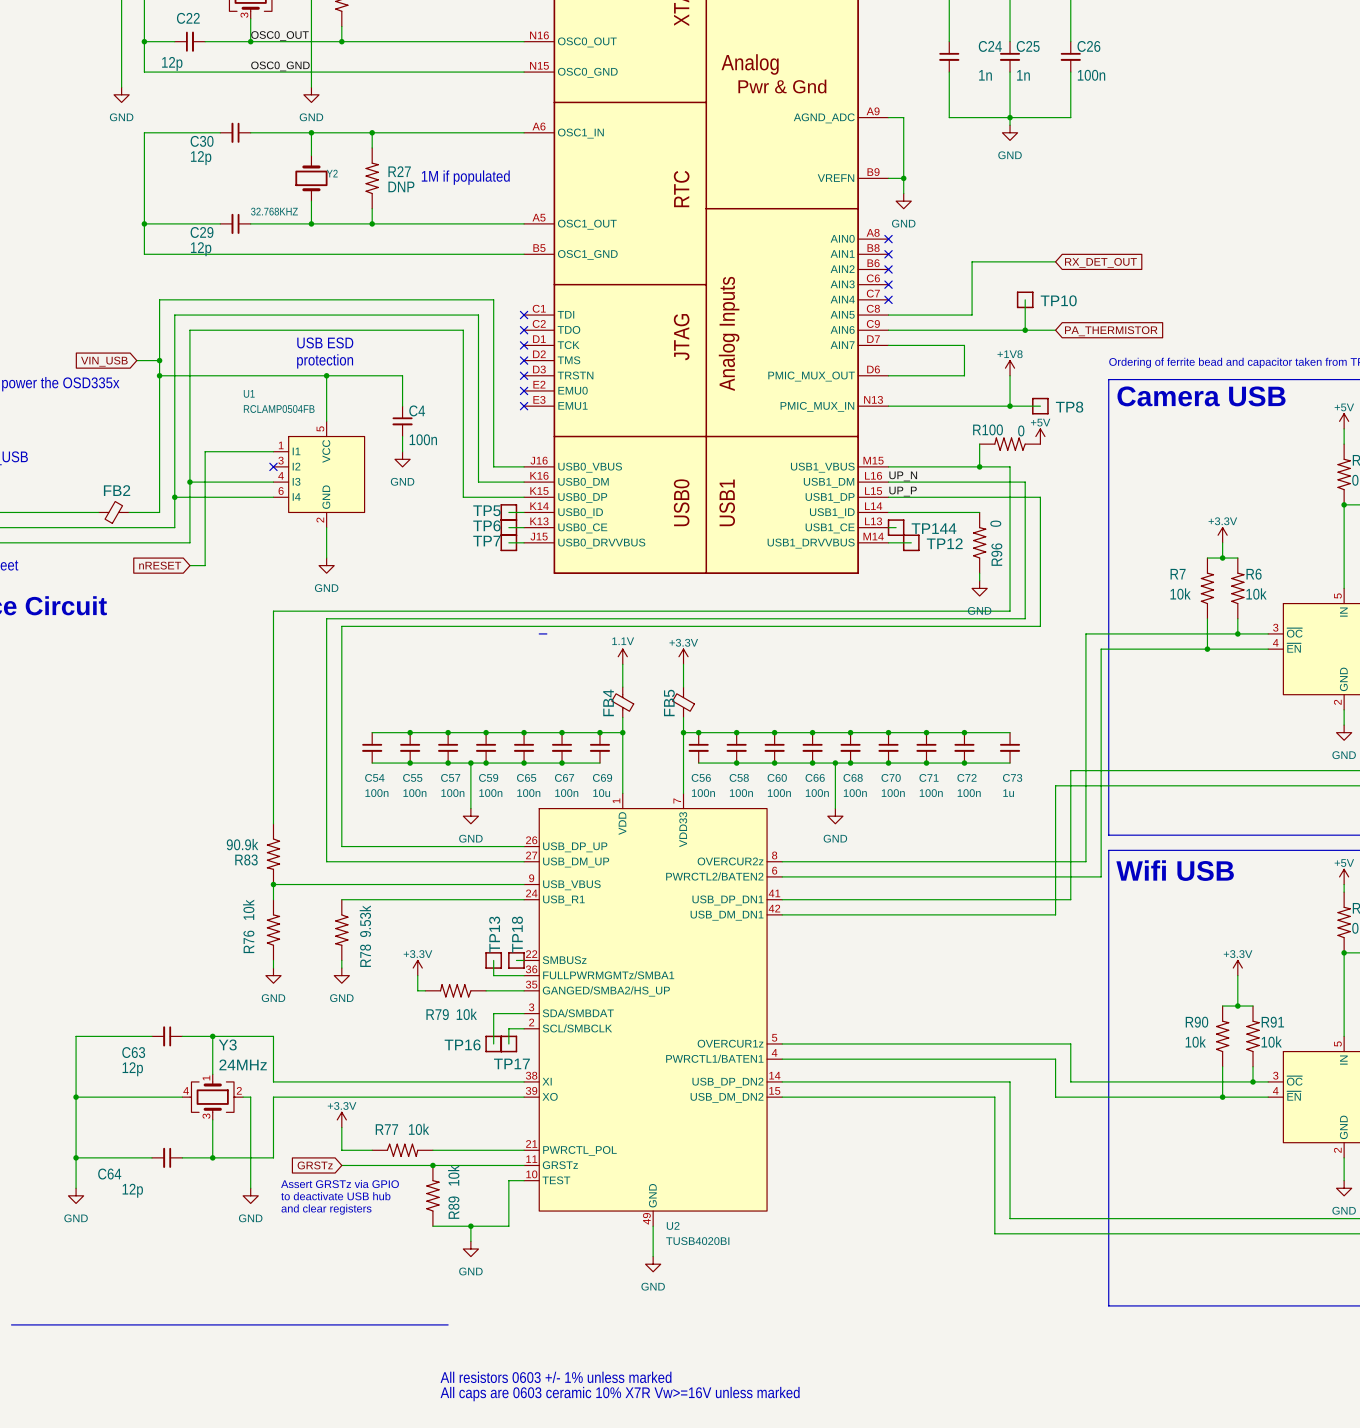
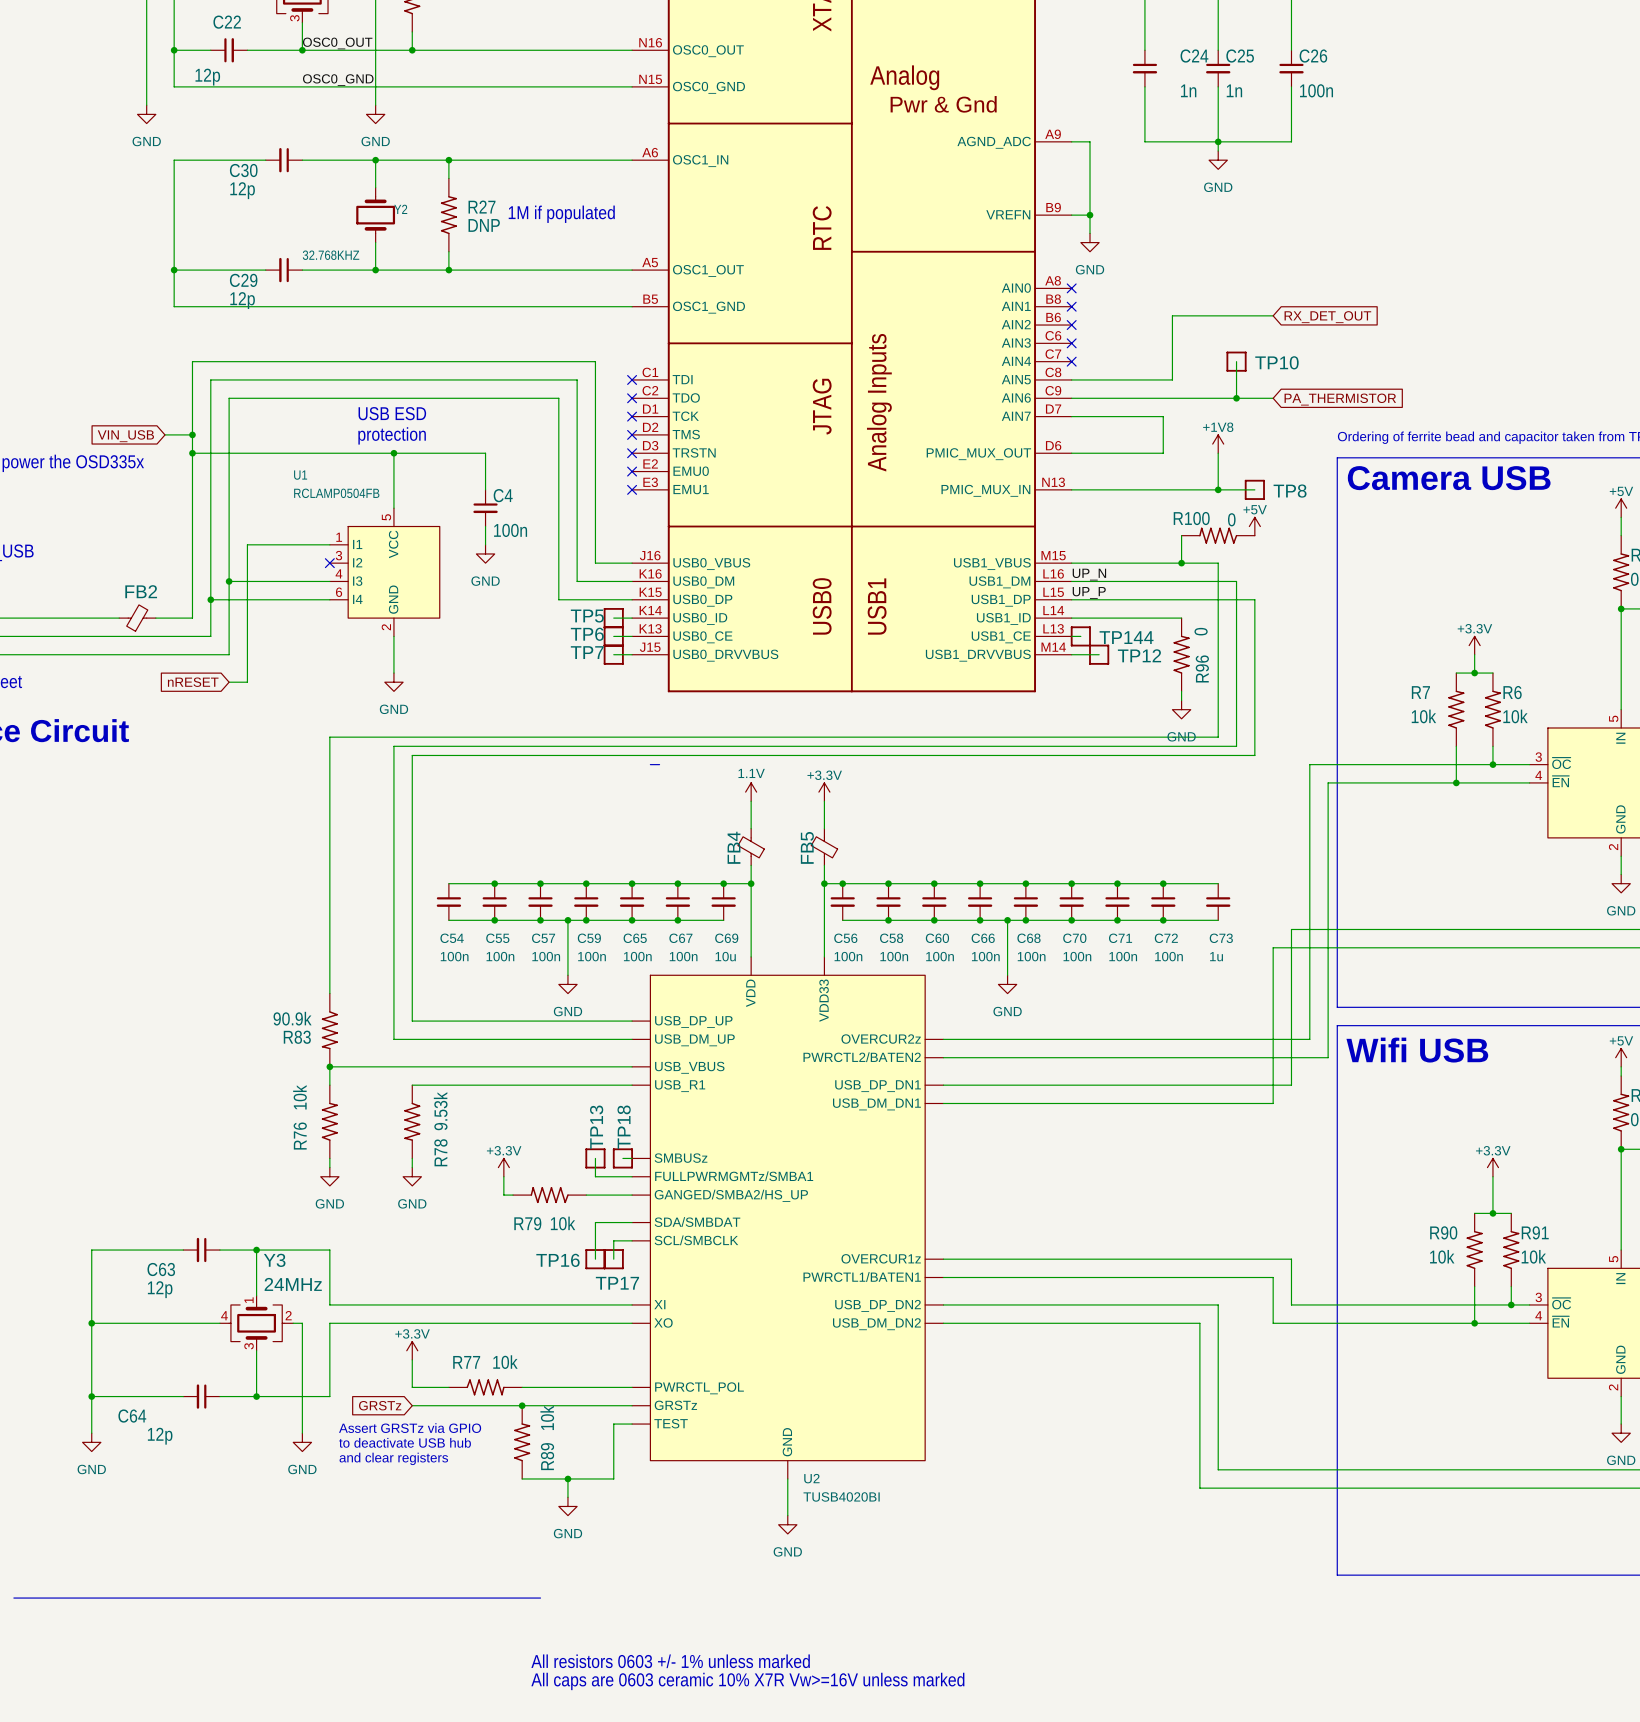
U2 symbol: [524, 793, 783, 1227] -> [632, 956, 944, 1479]

